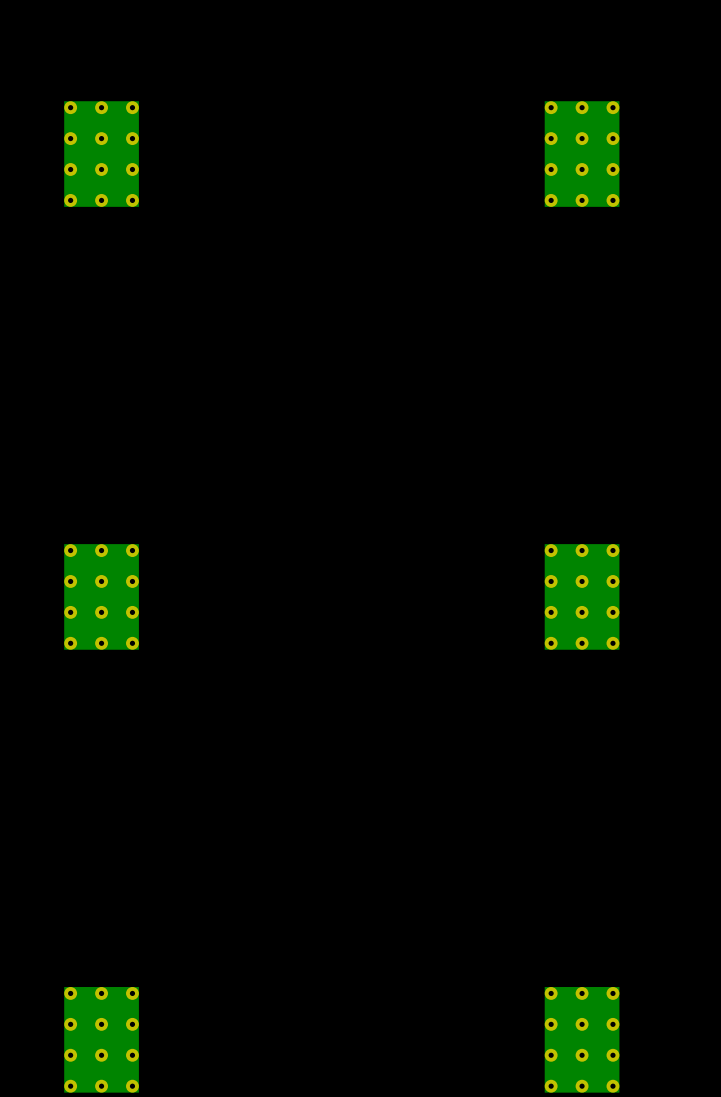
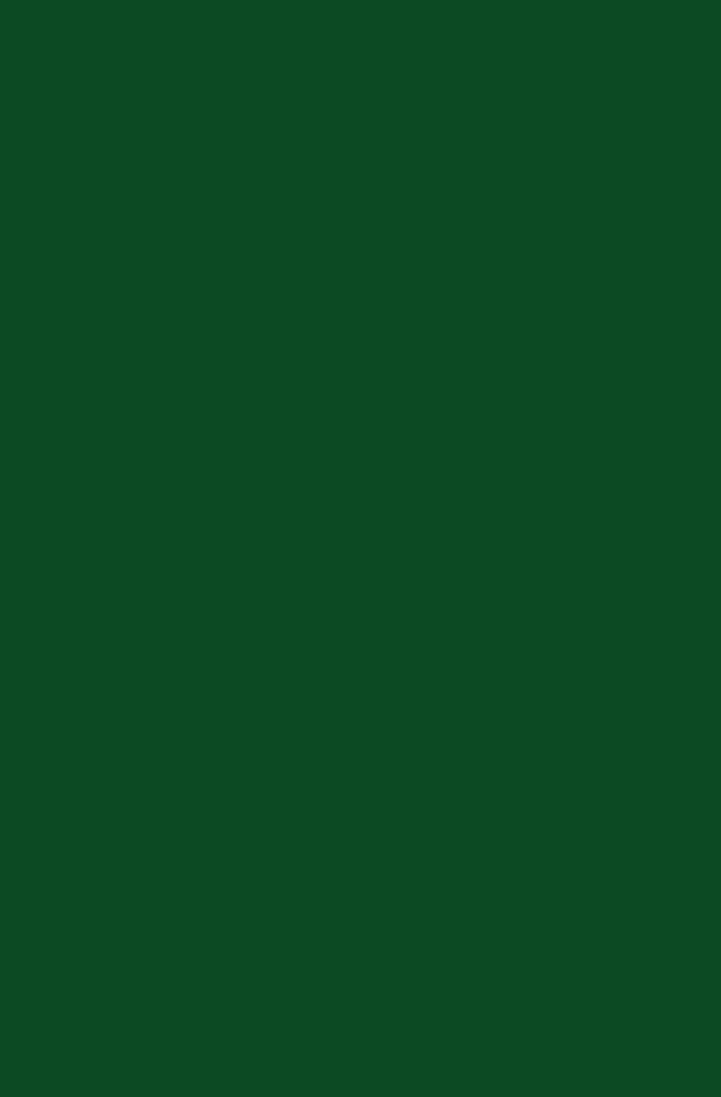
part: (101, 154) -> none
part: (582, 154) -> none
part: (101, 596) -> none
part: (582, 596) -> none
part: (101, 1039) -> none
part: (582, 1039) -> none

